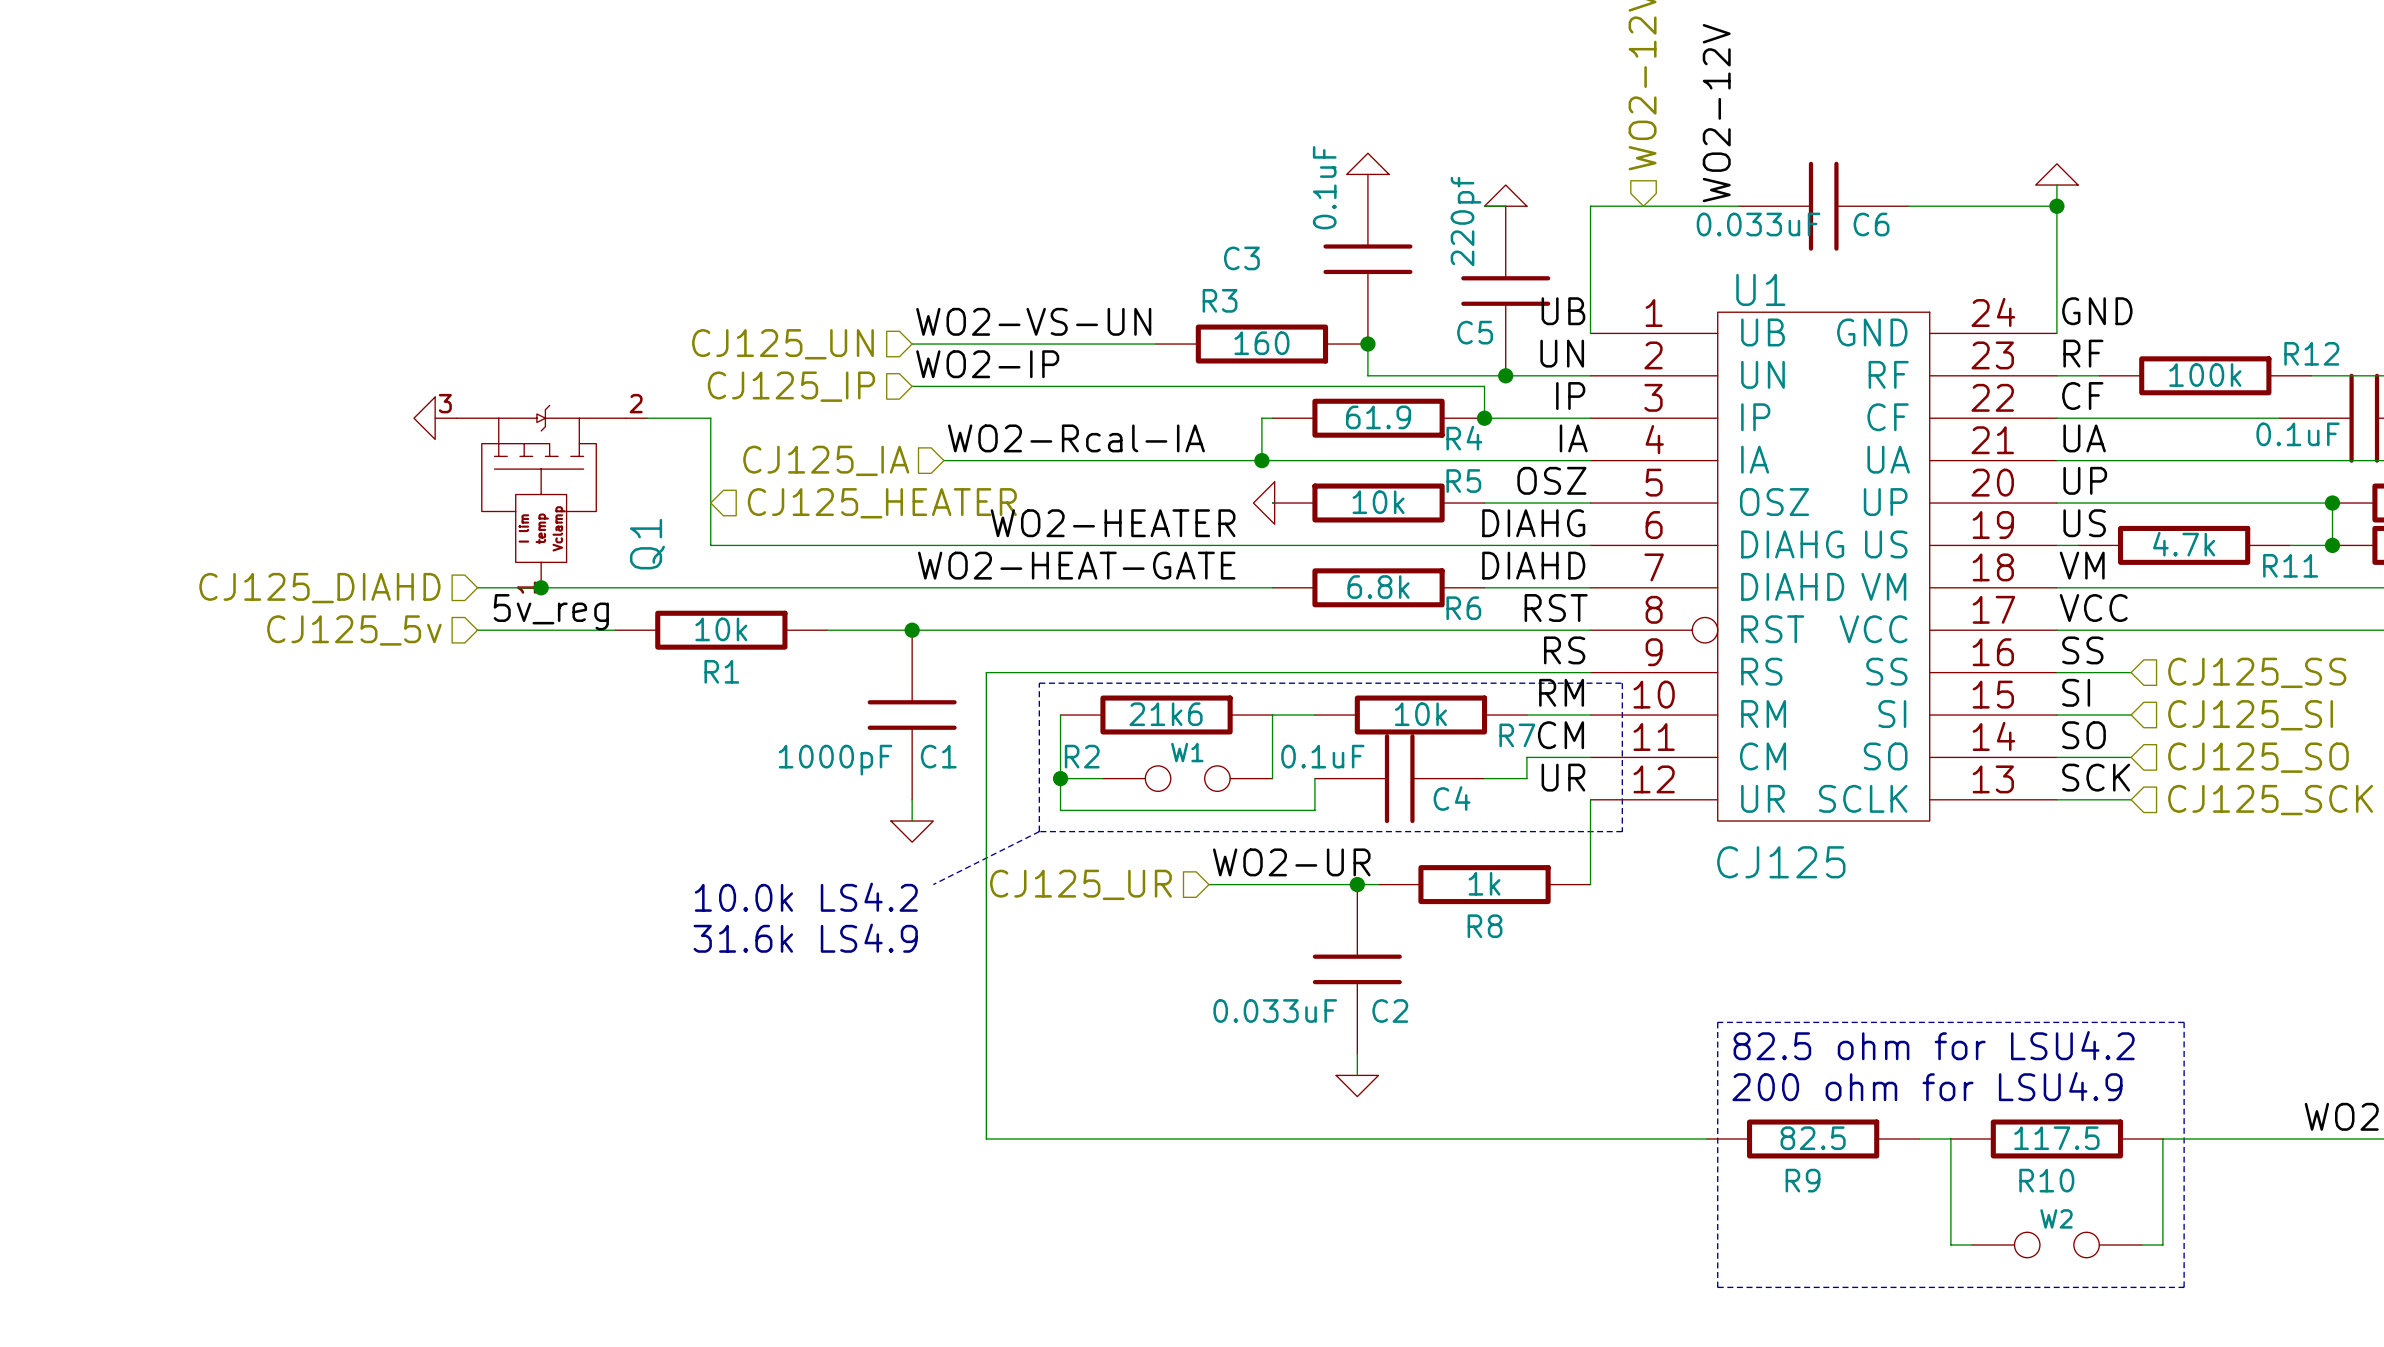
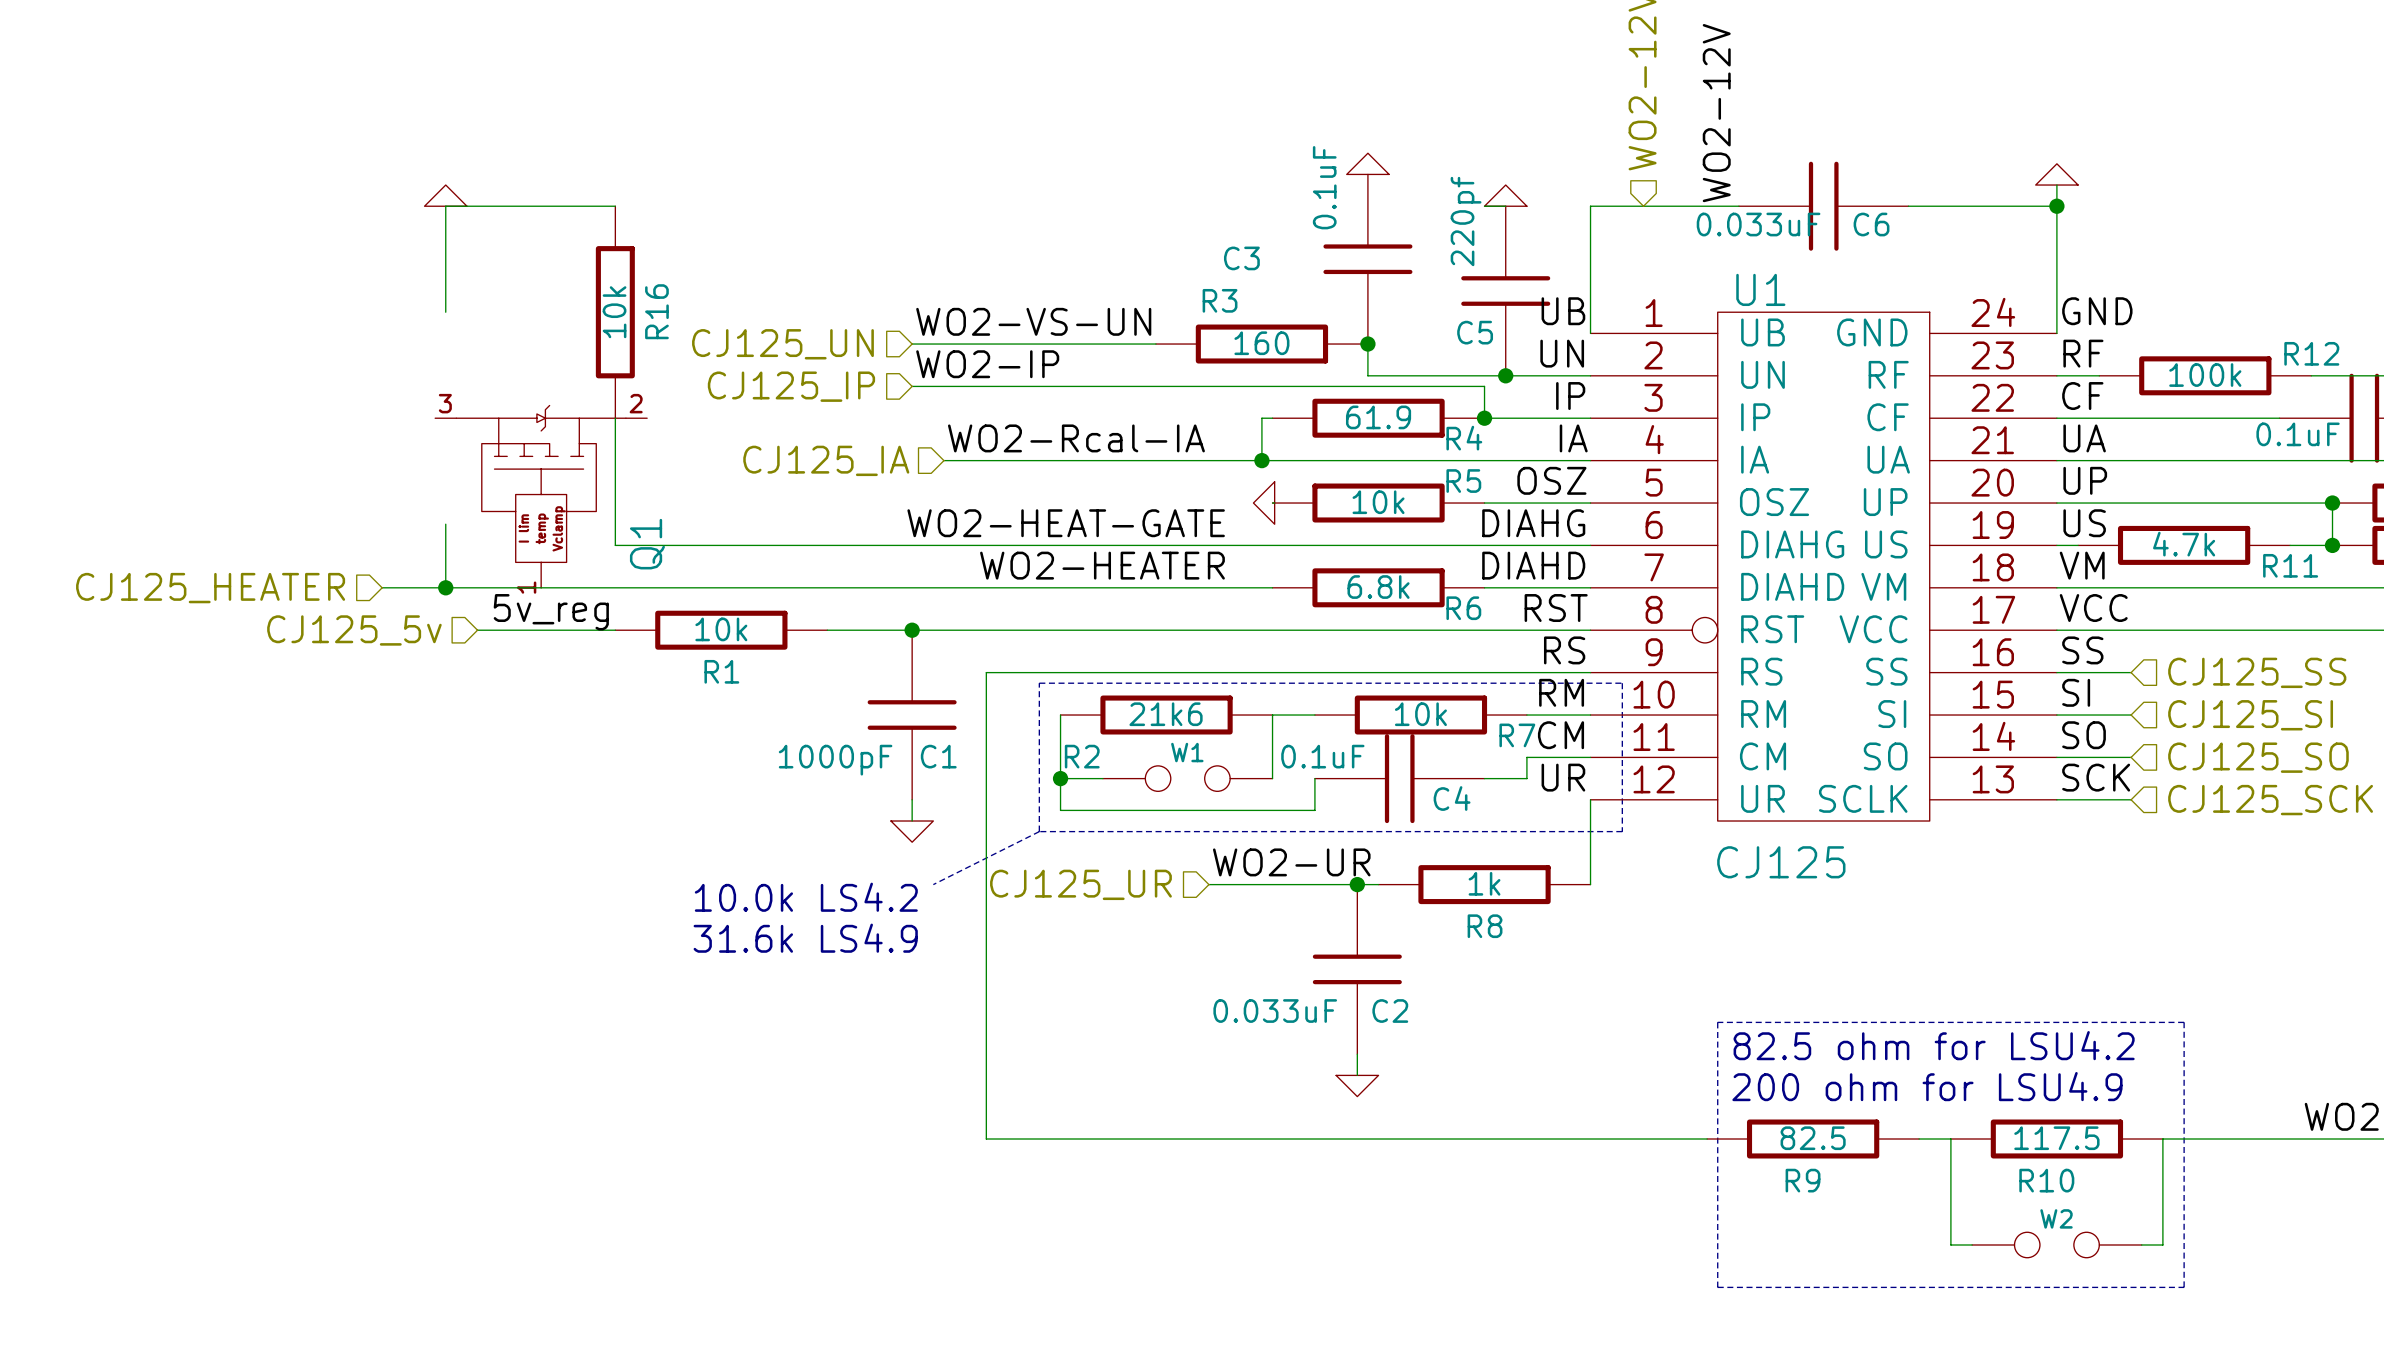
wire: none -> (615, 206) (445, 206) (445, 312)
R16: none -> 10k (615, 312)
power symbol rotation: 0° (424, 418) -> 90° clockwise (445, 195)
power symbol position: (424, 418) -> (445, 195)
wire: (647, 418) (710, 418) (710, 545) -> (615, 418) (615, 545) (710, 545)
hierarchical label rotation: 0° (882, 503) -> 180° (210, 588)
hierarchical label position: CJ125_HEATER (882, 503) -> CJ125_HEATER (210, 588)
label position: WO2-HEATER (1113, 523) -> WO2-HEATER (1102, 565)
wire: none -> (445, 524) (445, 587)
label position: WO2-HEAT-GATE (1076, 565) -> WO2-HEAT-GATE (1066, 523)
wire: none -> (382, 587) (477, 587)
junction position: (541, 587) -> (445, 587)
hierarchical label: CJ125_DIAHD (319, 588) -> none

